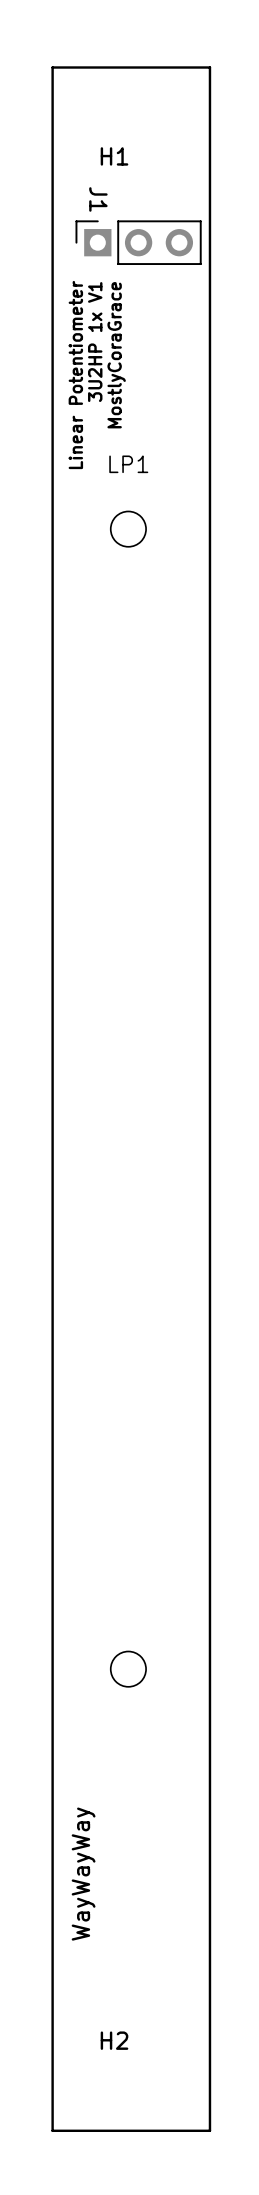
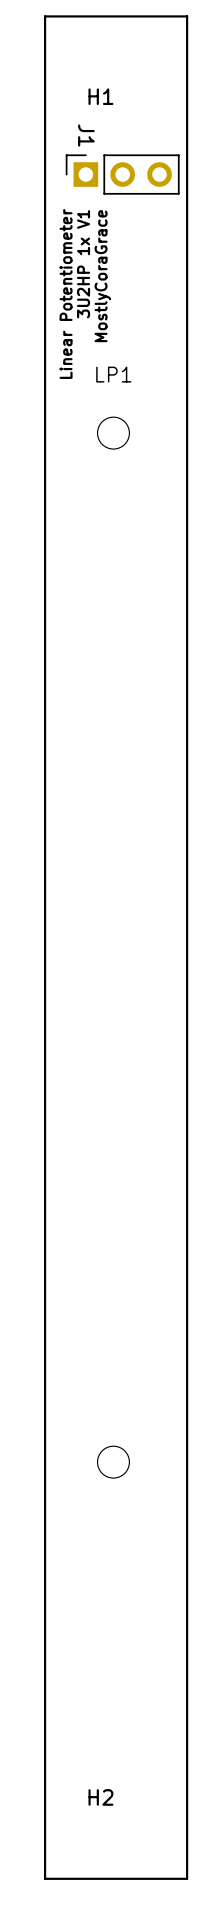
text: WayWayWay (83, 1874) -> none

